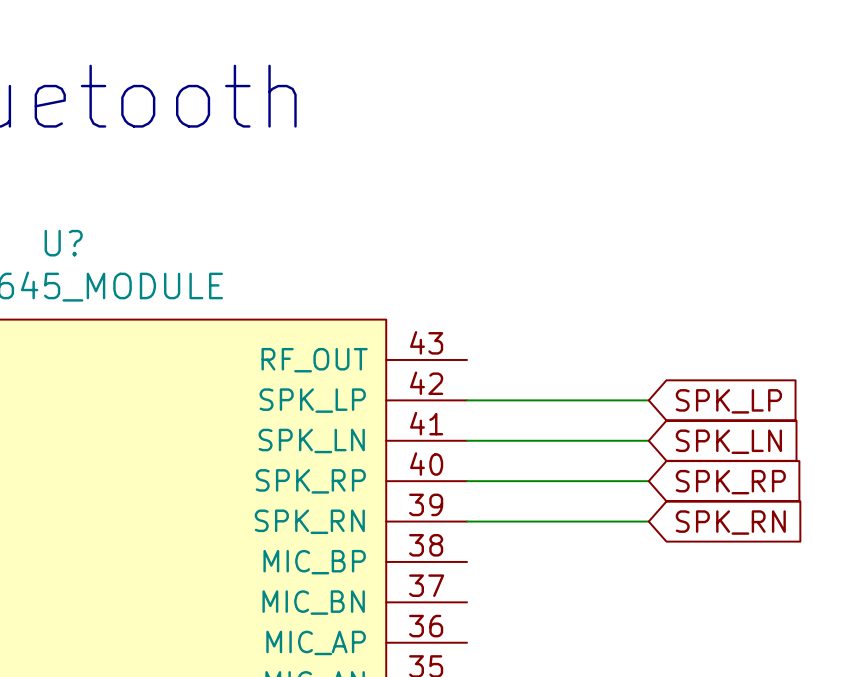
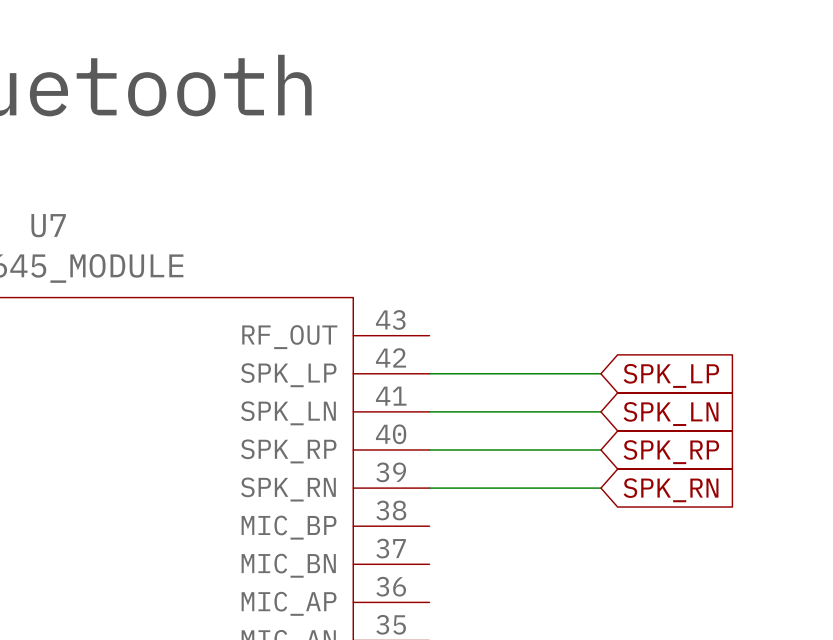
U? name: U? (63, 243) -> U7 (48, 225)

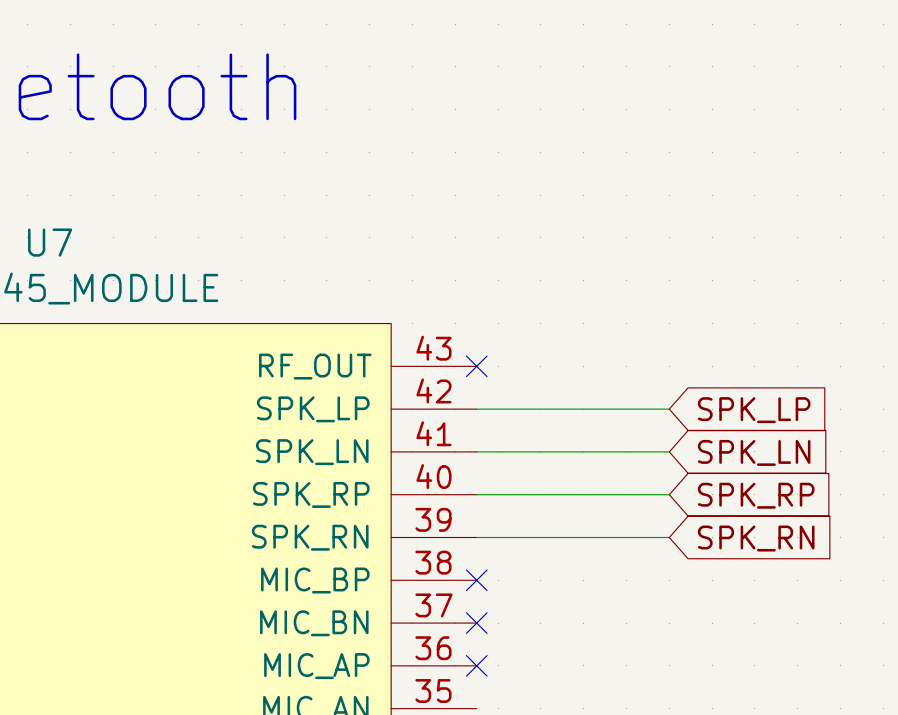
no-connect mark: none -> (476, 366)
no-connect mark: none -> (476, 580)
no-connect mark: none -> (476, 623)
no-connect mark: none -> (476, 665)

